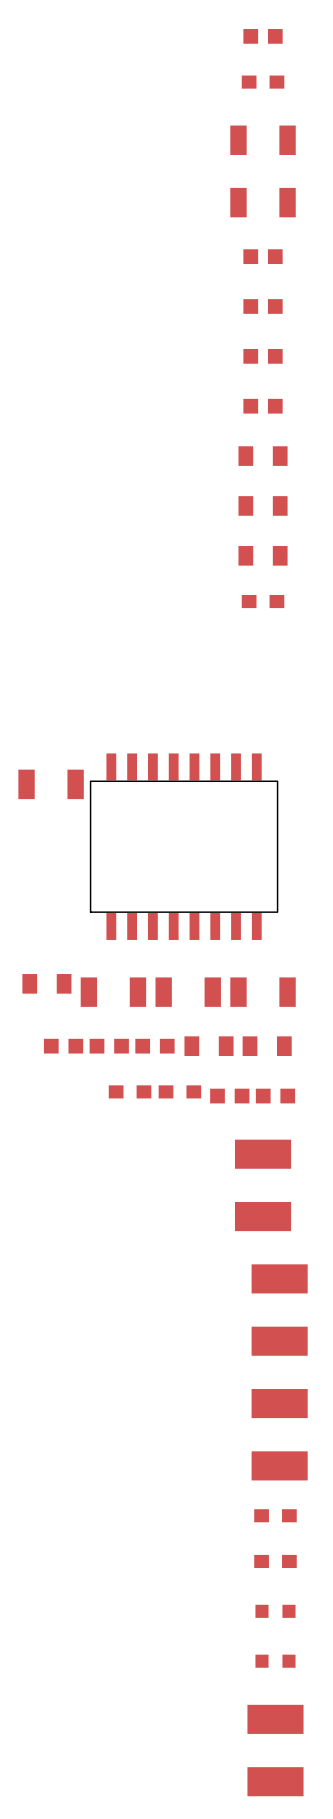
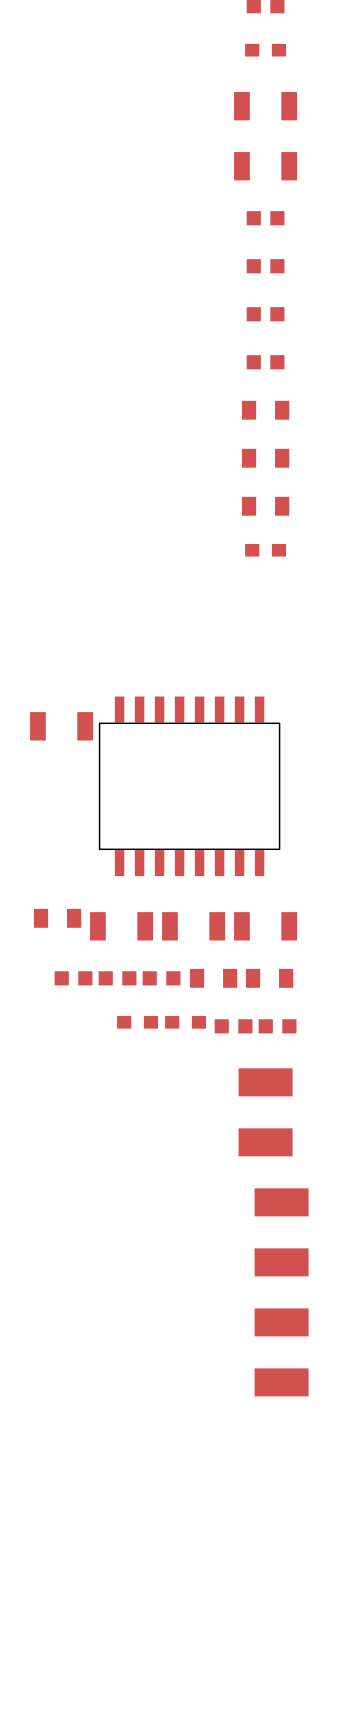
part: (275, 1515) -> none
part: (275, 1561) -> none
part: (275, 1611) -> none
part: (275, 1661) -> none
part: (275, 1719) -> none
part: (275, 1781) -> none

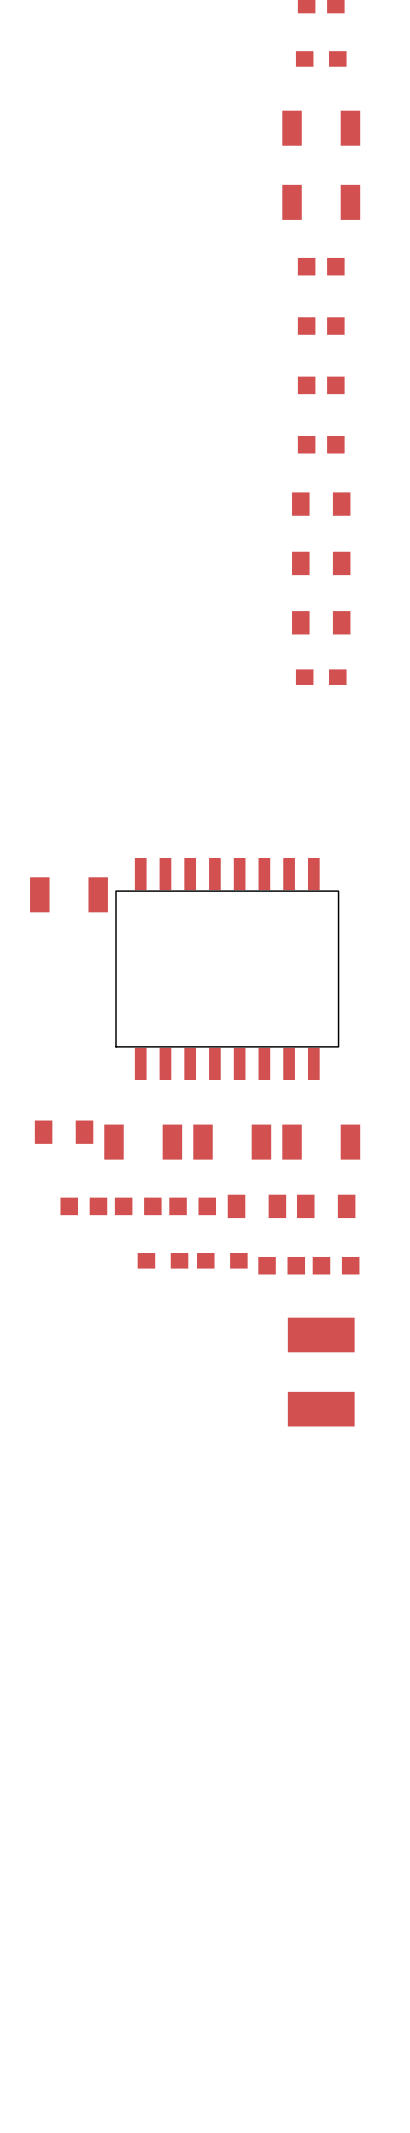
part: (281, 1202) -> none
part: (281, 1262) -> none
part: (281, 1322) -> none
part: (281, 1382) -> none

